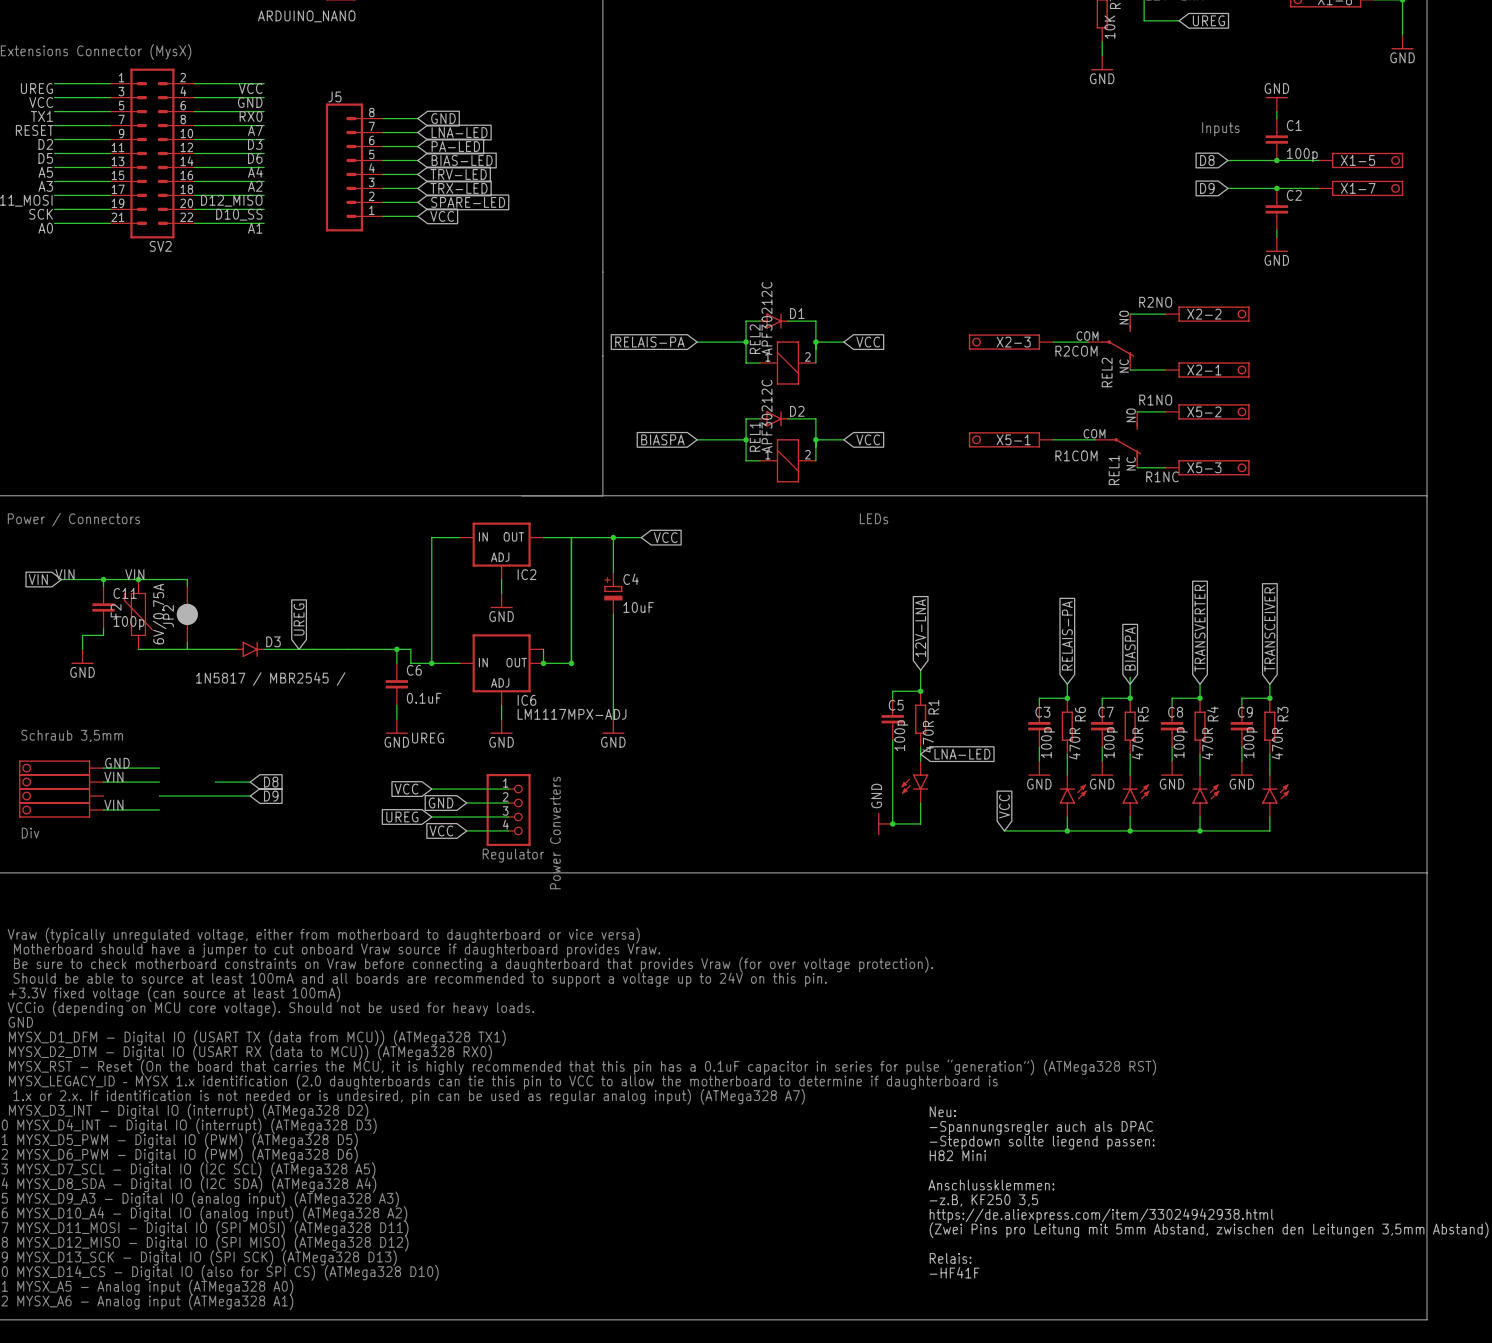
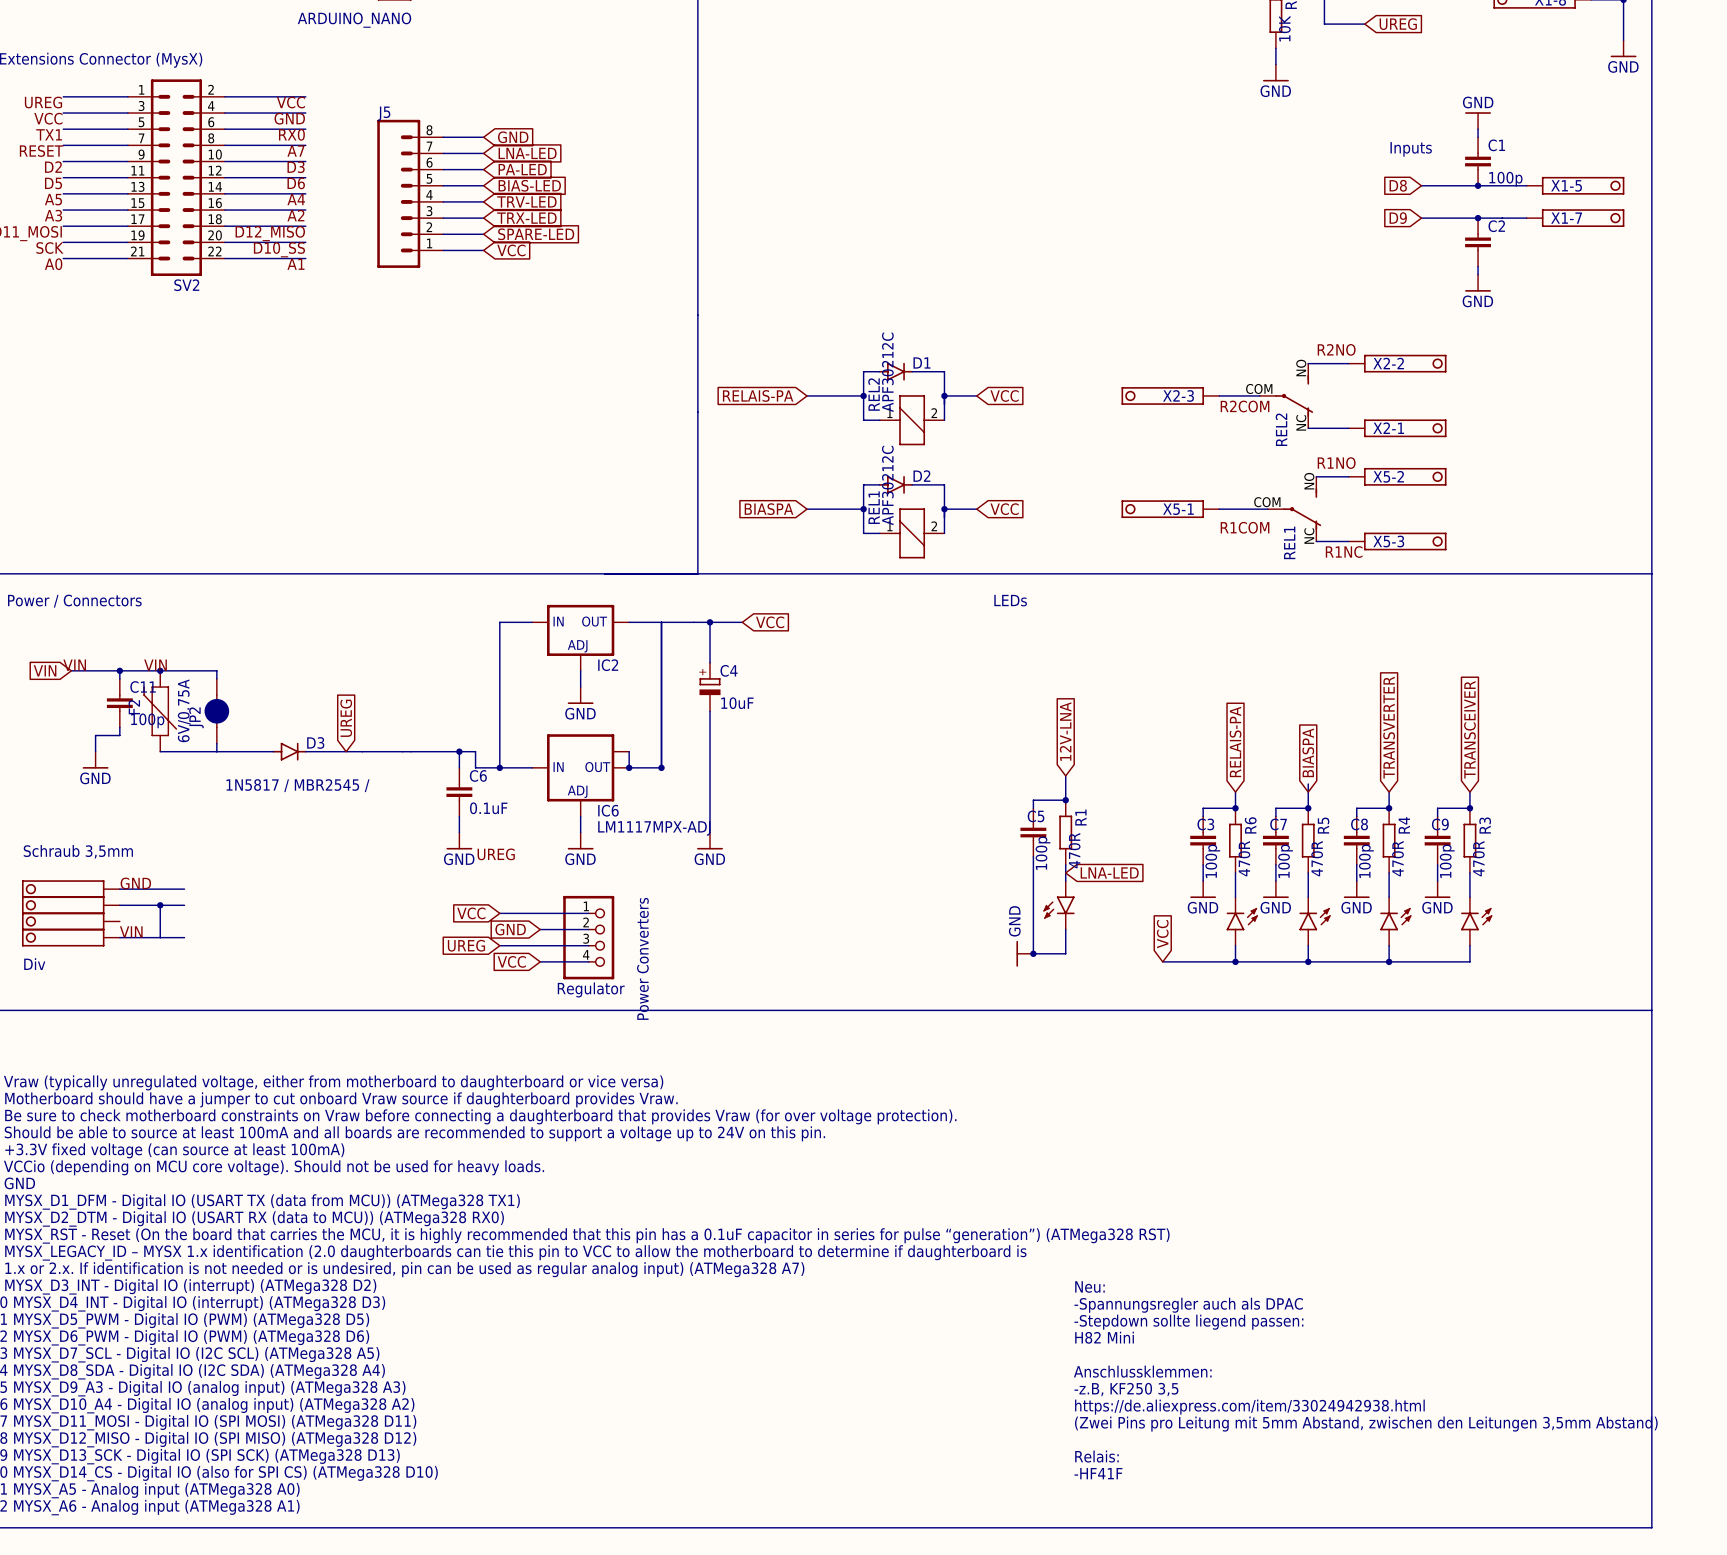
label: VIN (113, 777) -> none
wire: none -> (160, 905) (160, 937)
junction: none -> (160, 905)
wire: (215, 782) (250, 782) -> none
global label: D8 (271, 782) -> none
wire: (159, 796) (250, 796) -> none
global label: D9 (271, 796) -> none

